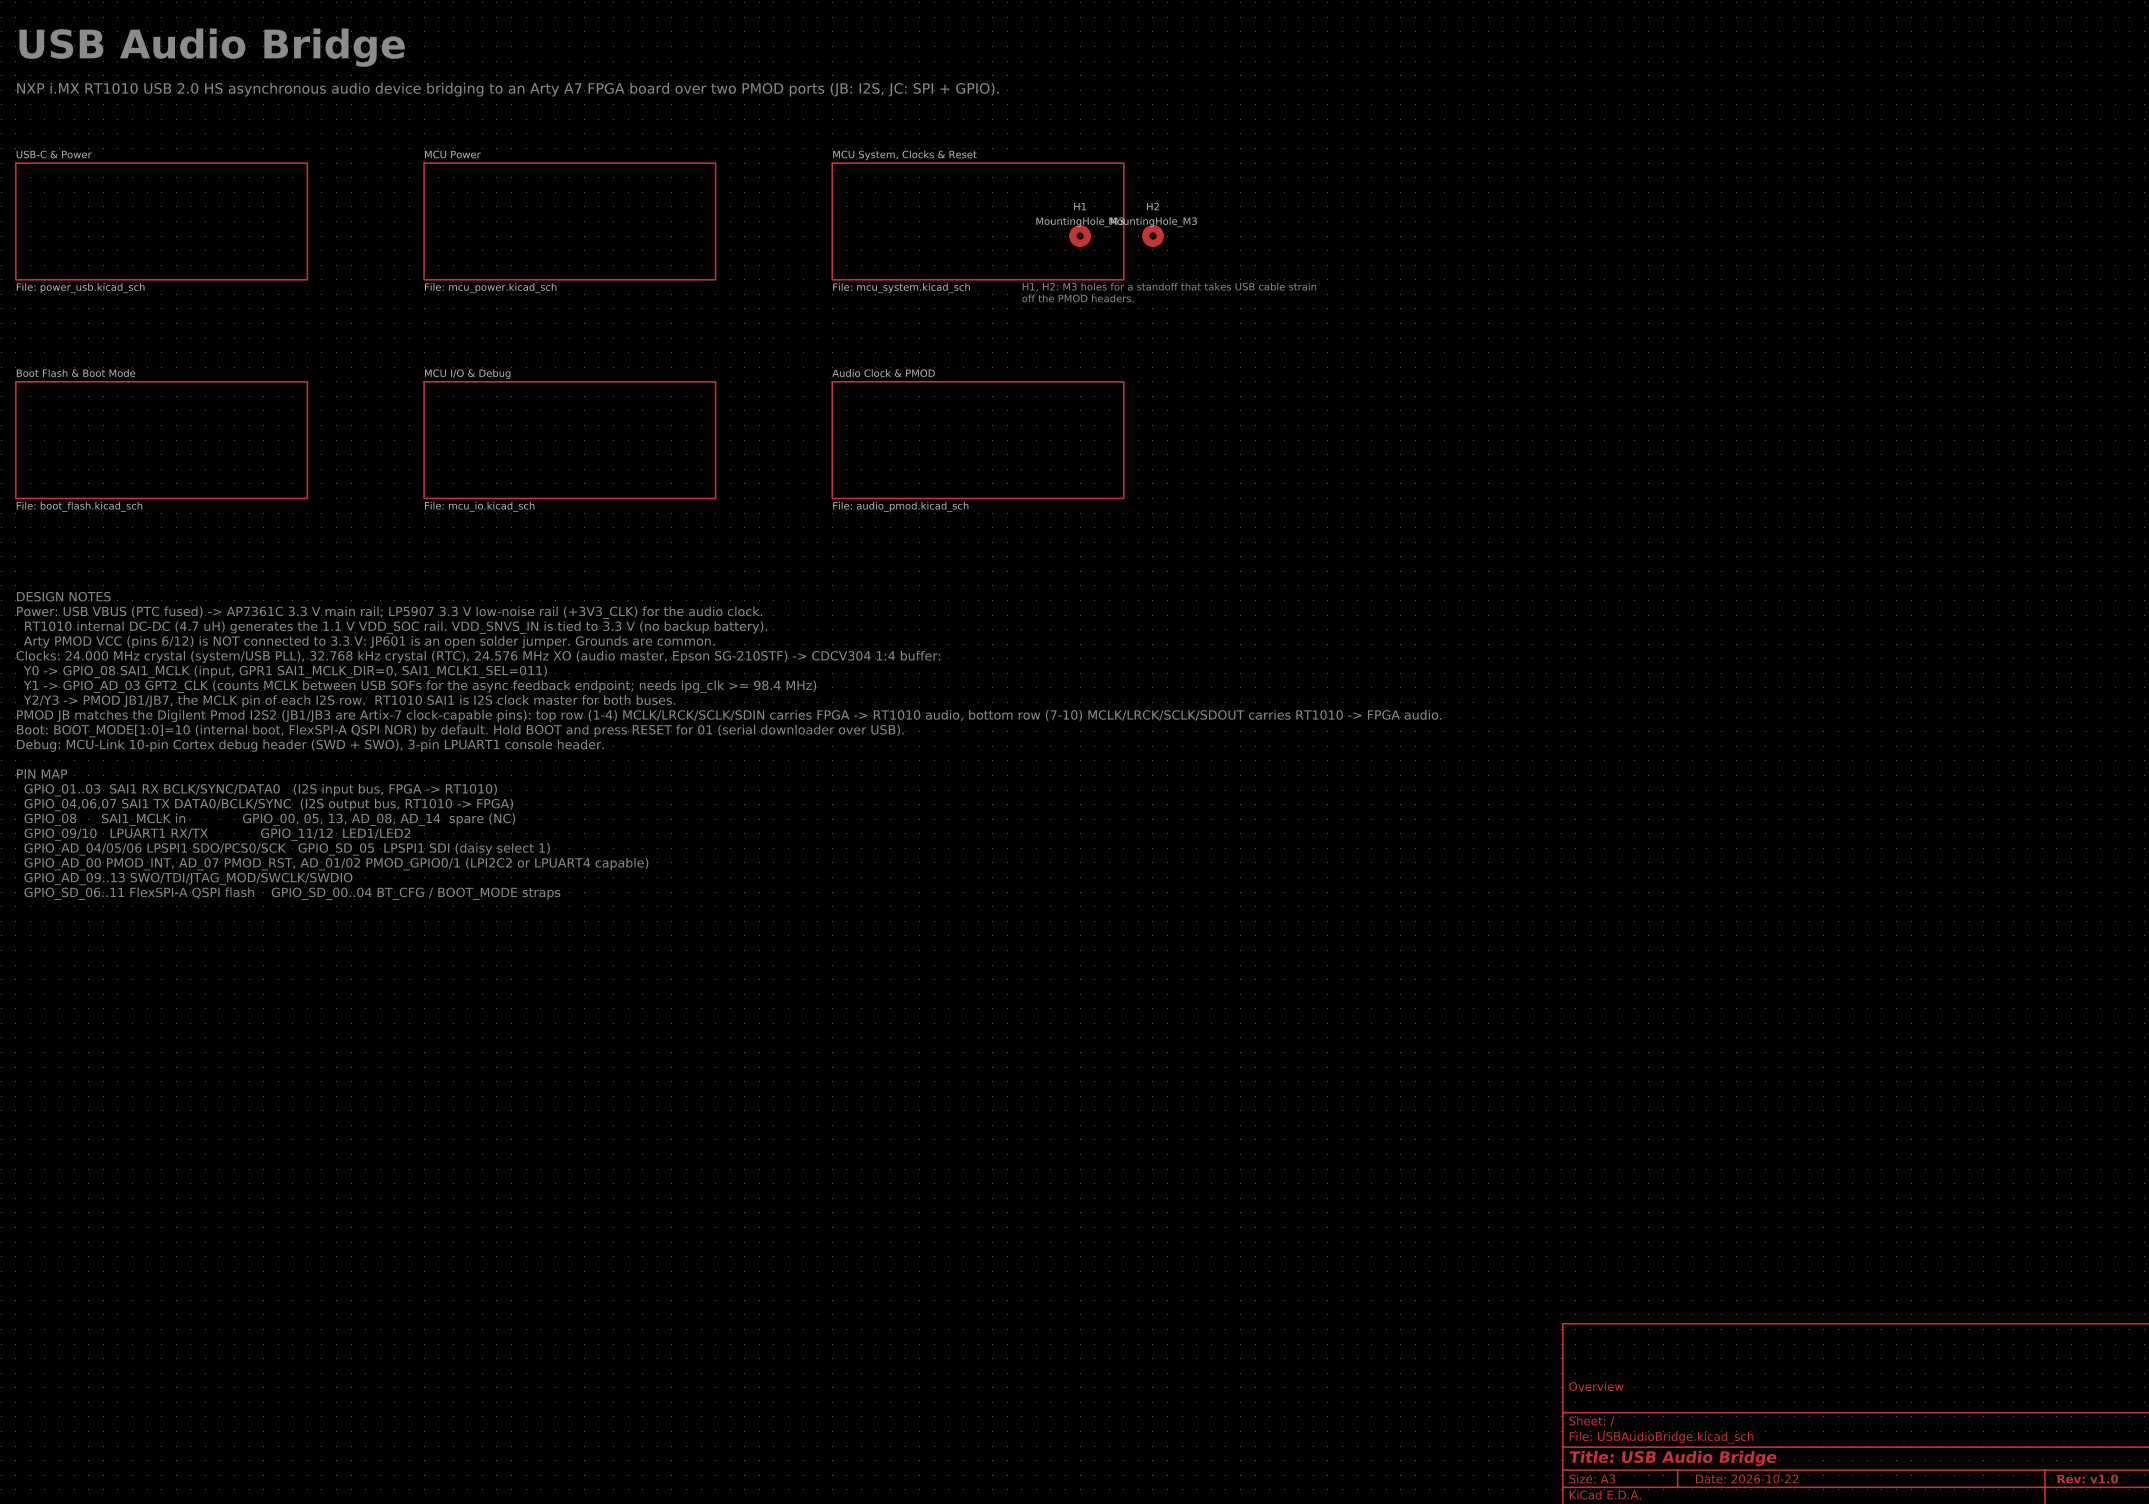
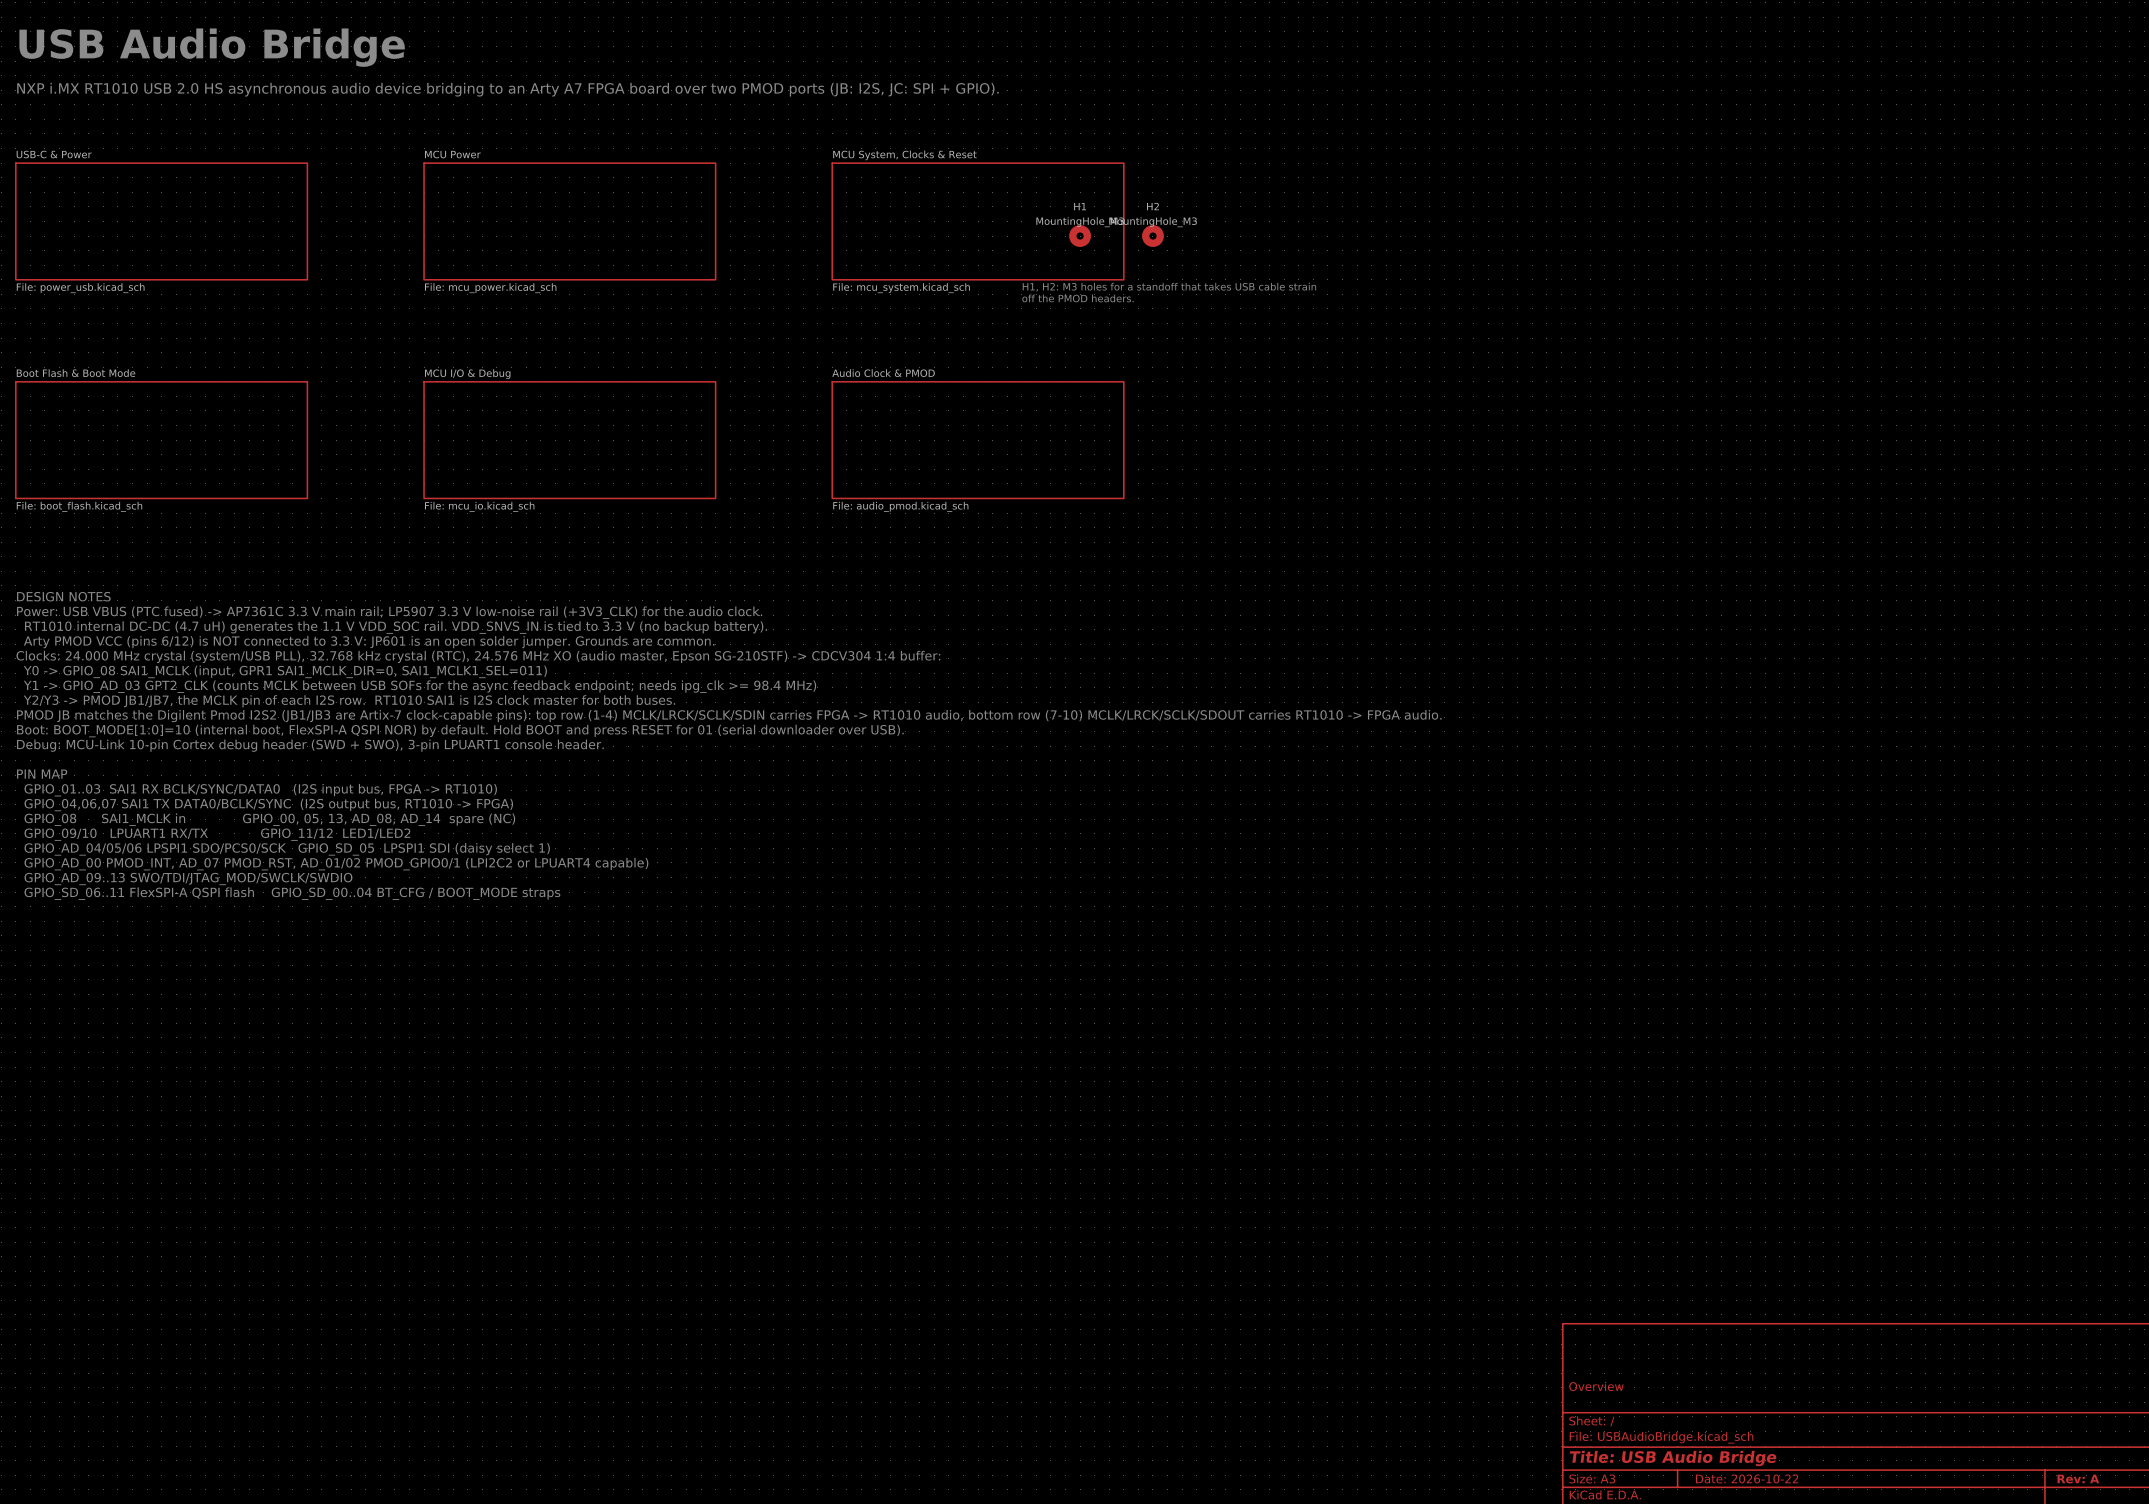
title block: Rev: v1.0 (2087, 1478) -> Rev: A (2078, 1479)

